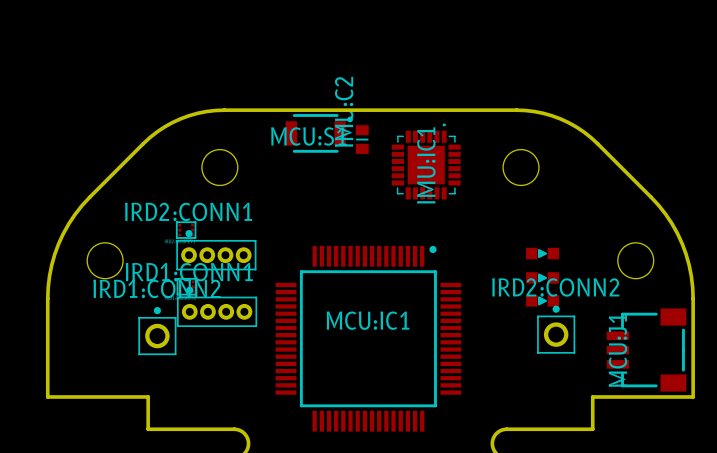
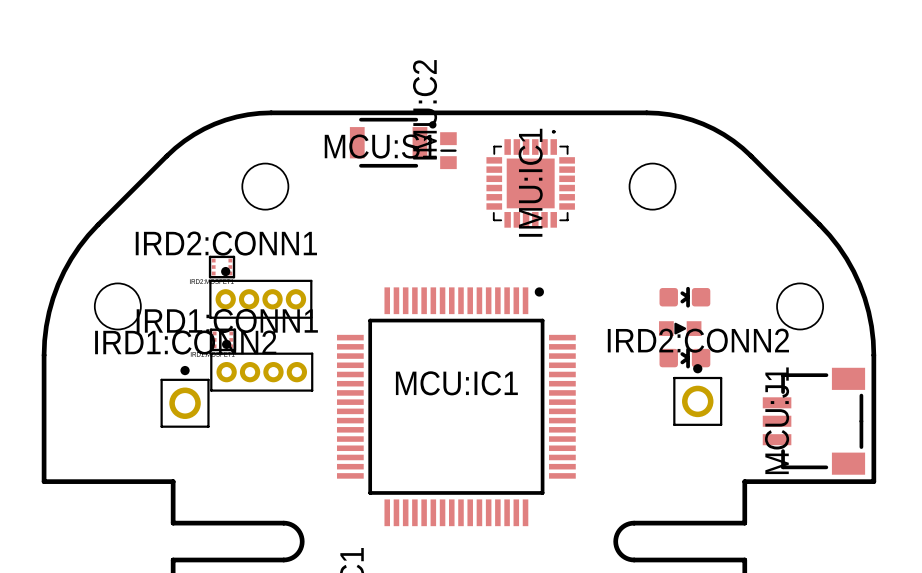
part footprint: [526, 247, 560, 260] -> [659, 286, 711, 308]
part footprint: [526, 295, 560, 307] -> [659, 347, 711, 369]

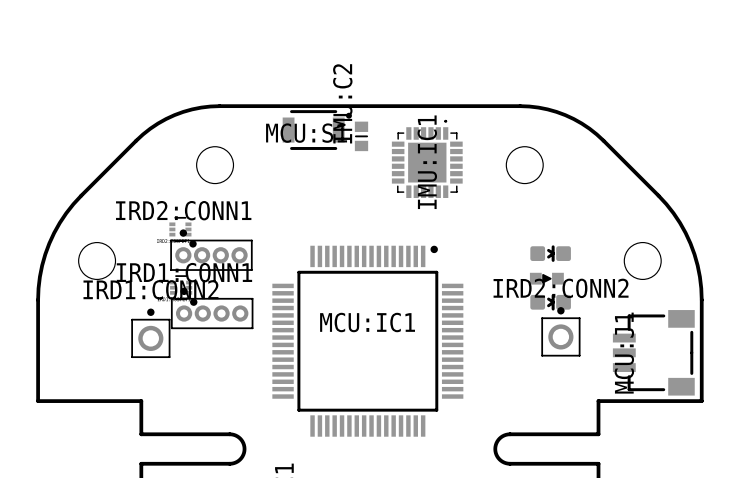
part footprint: [208, 255, 236, 279] -> [169, 216, 197, 248]
part footprint: [209, 328, 237, 352] -> [170, 275, 198, 306]

